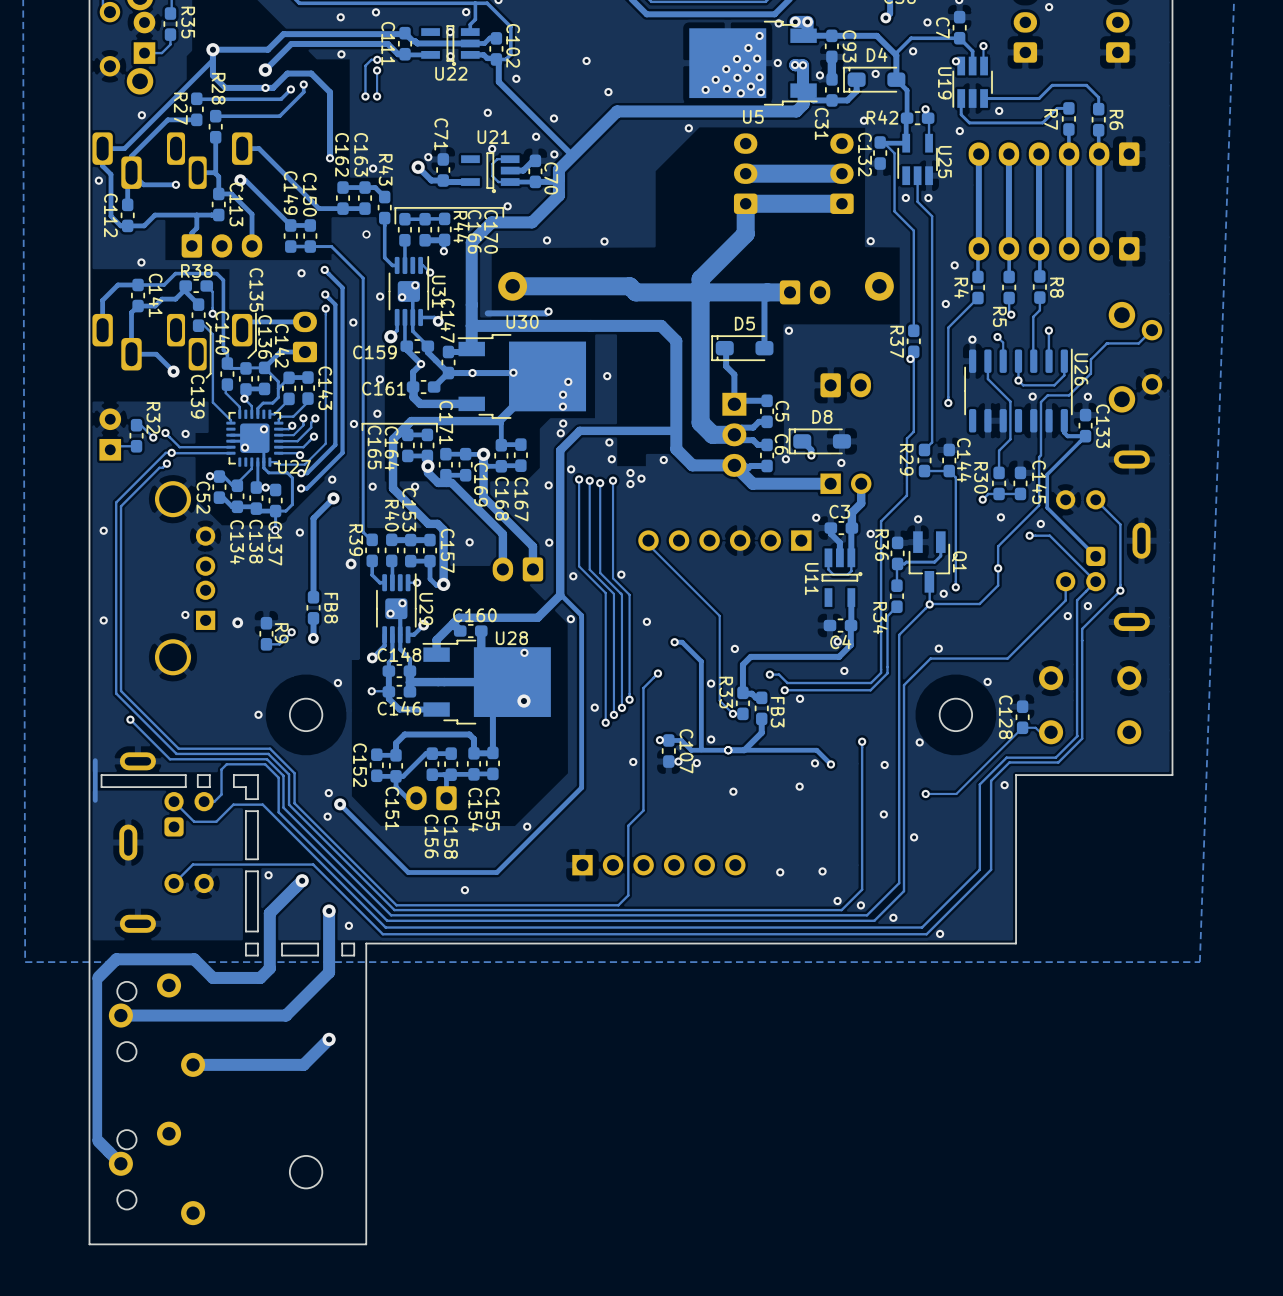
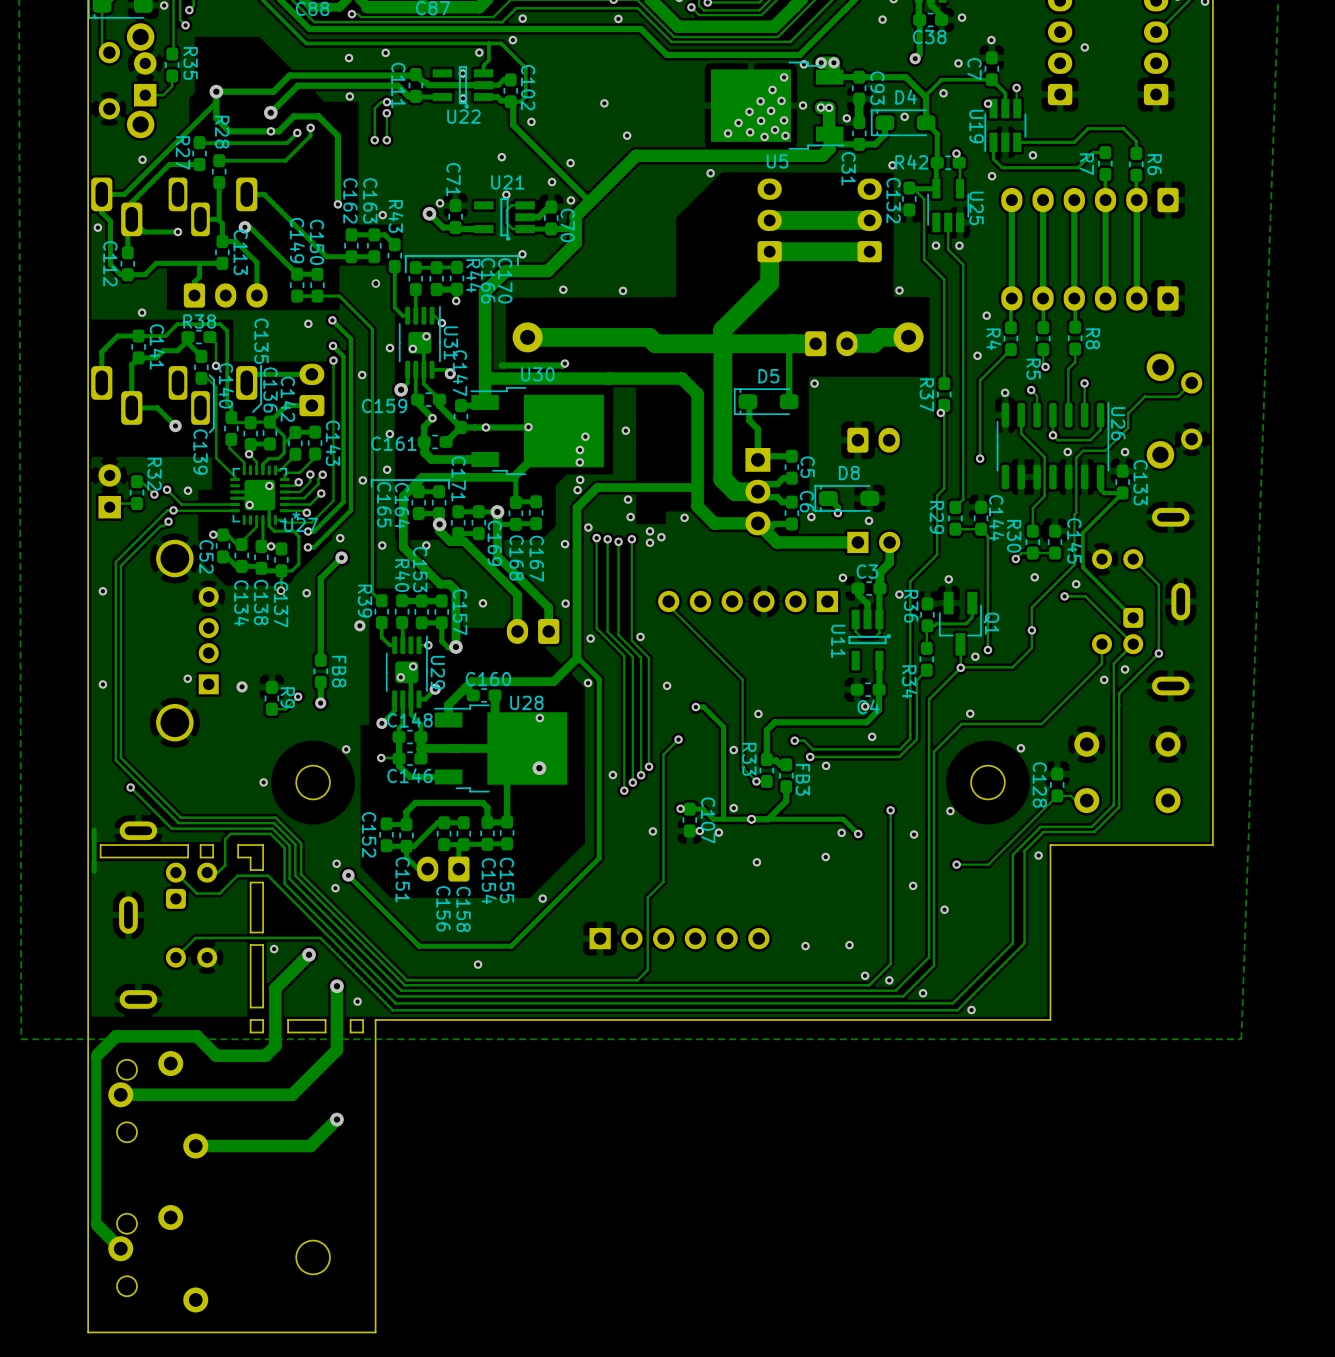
track: none -> (908, 337) (879, 337) (873, 343) (846, 343)
text: none -> * (296, 515)

